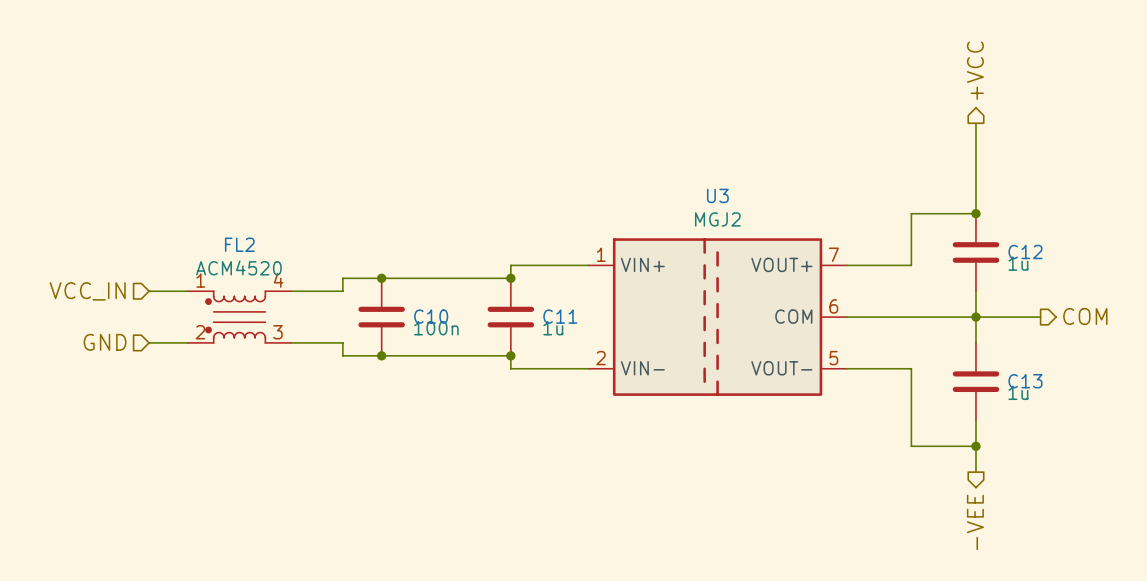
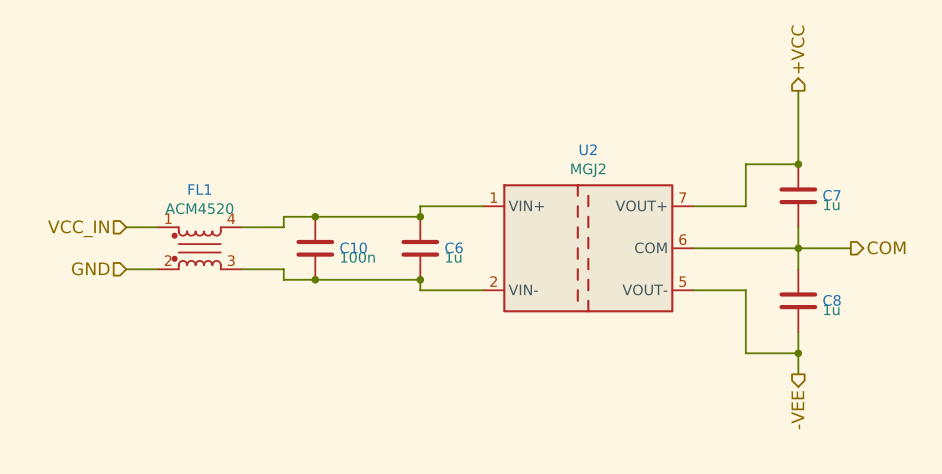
U3 name: U3 (717, 195) -> U2 (588, 149)
FL2 name: FL2 (239, 244) -> FL1 (199, 189)
C12 name: C12 (1025, 251) -> C7 (831, 195)
C11 name: C11 (560, 316) -> C6 (454, 247)
C13 name: C13 (1025, 381) -> C8 (832, 300)

